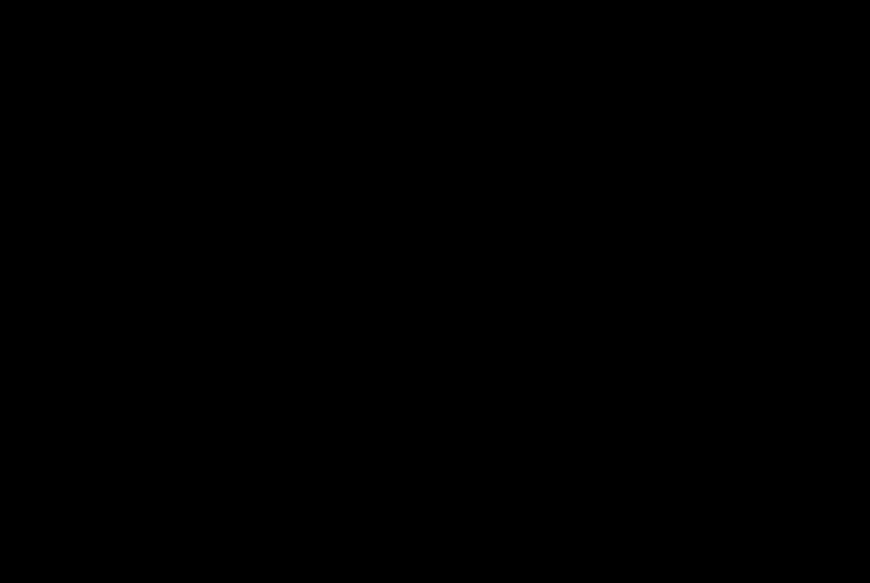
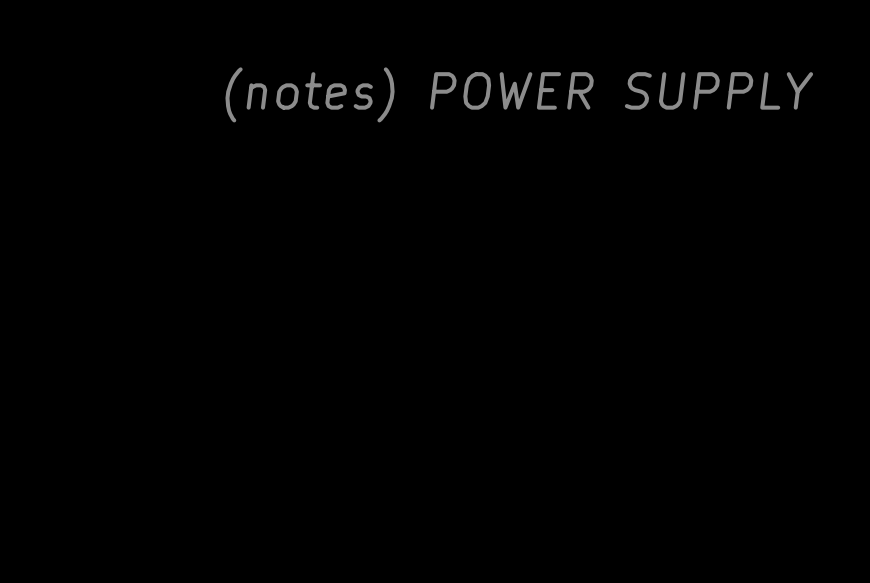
text: none -> (notes) POWER SUPPLY (519, 94)

